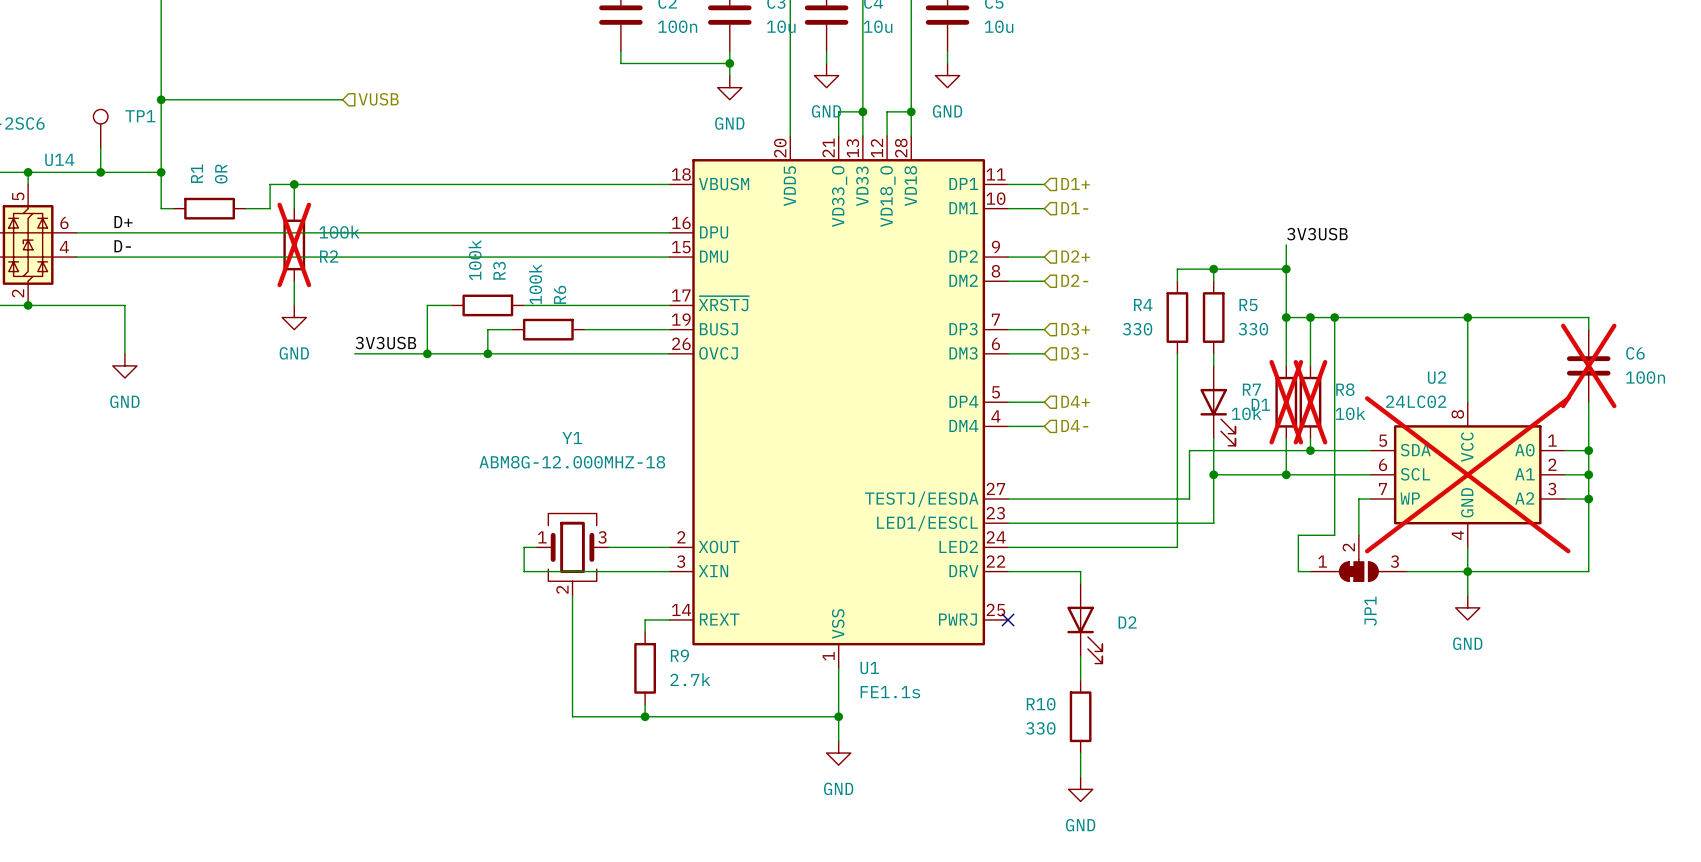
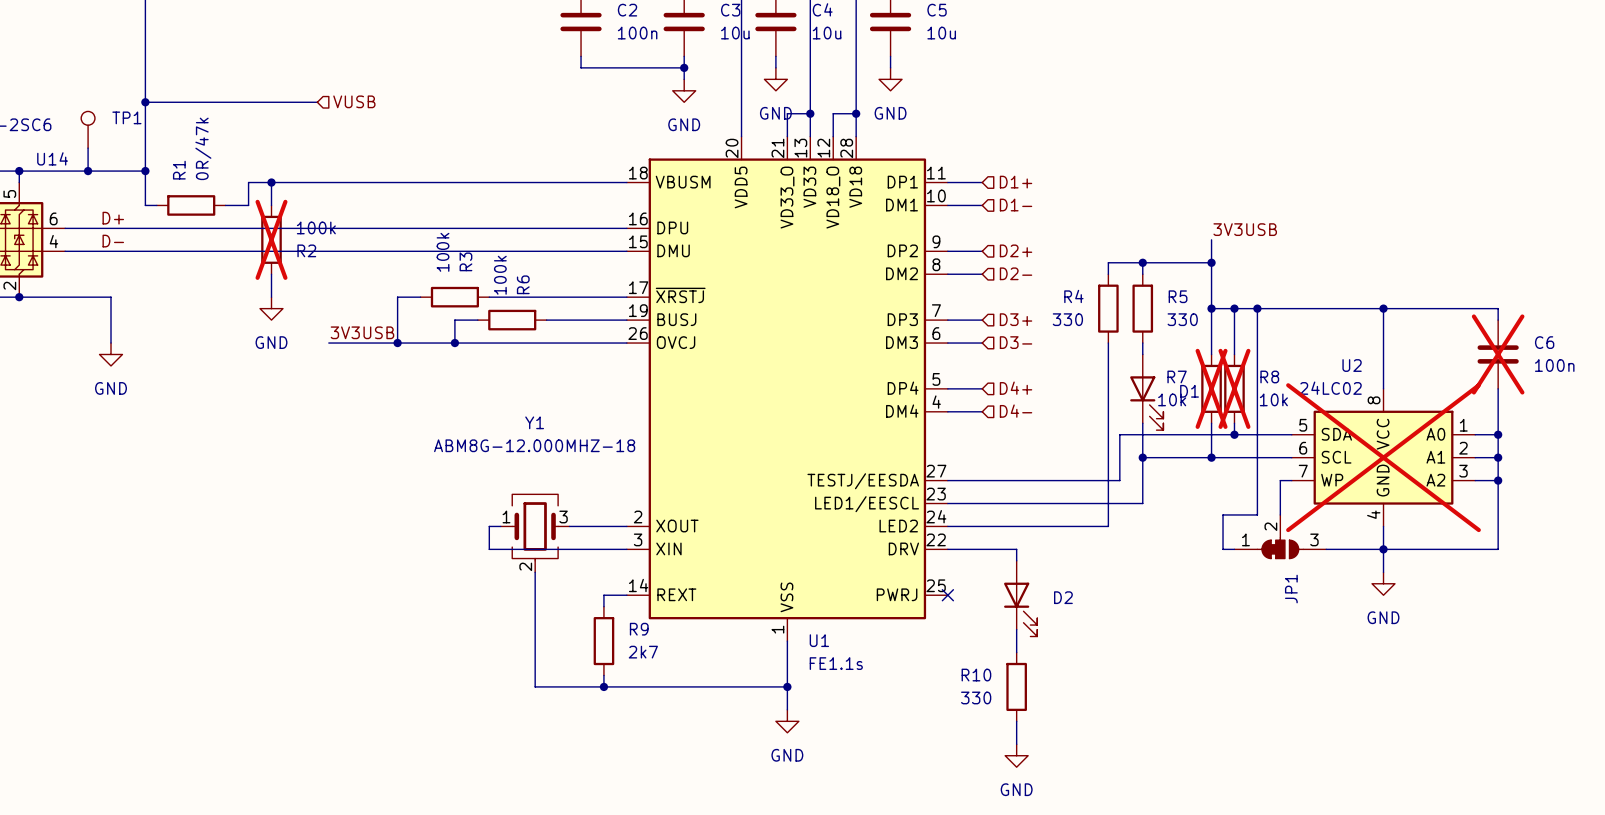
R1 value: 0R (221, 174) -> 0R/47k (203, 148)
R9 value: 2.7k (690, 679) -> 2k7 (643, 652)

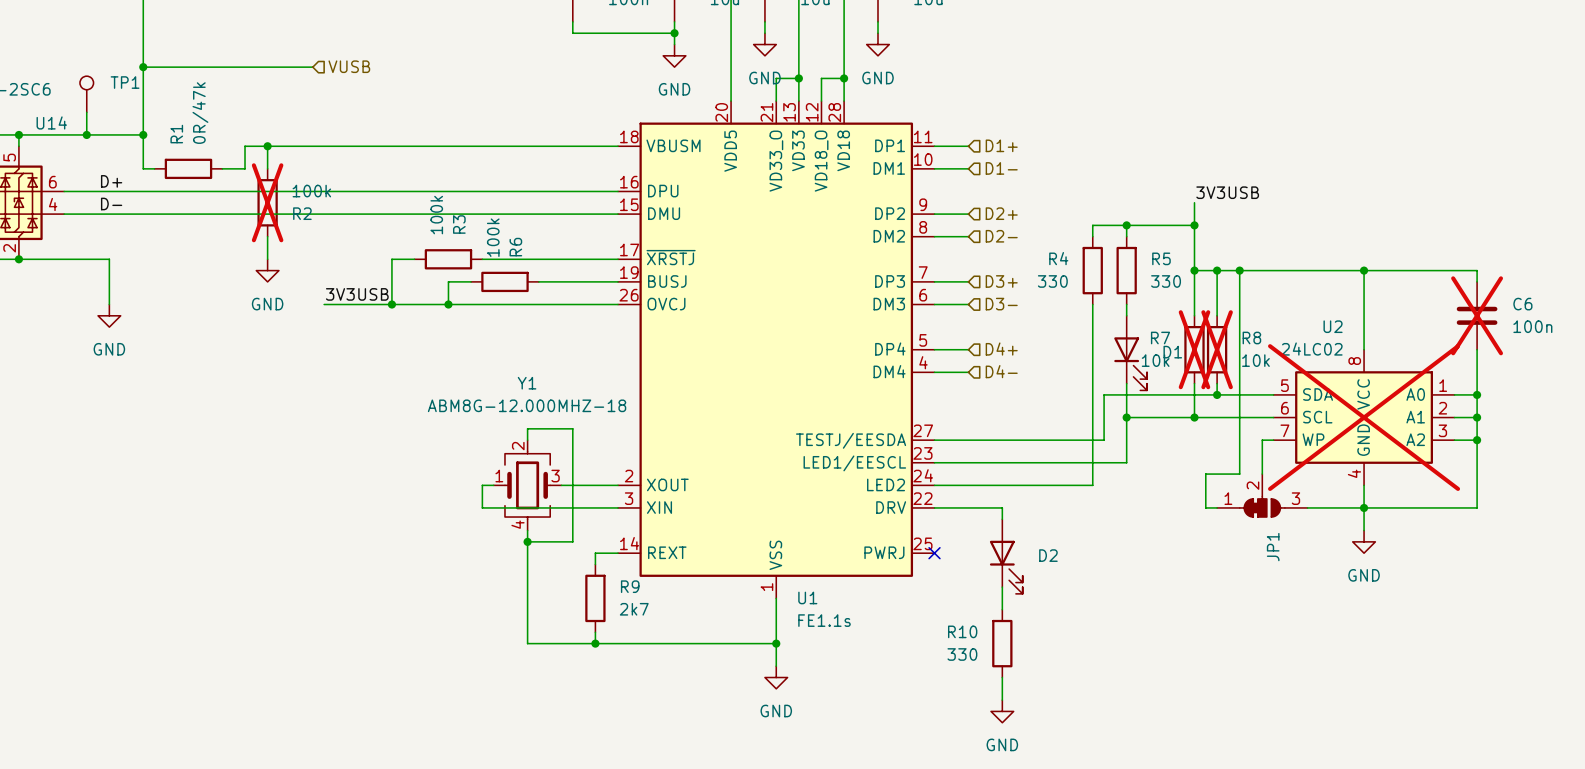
wire: none -> (527, 440) (527, 428) (572, 428) (572, 541) (527, 541)
Y1 symbol: [500, 494, 570, 573] -> [493, 440, 562, 531]
junction: none -> (527, 541)

